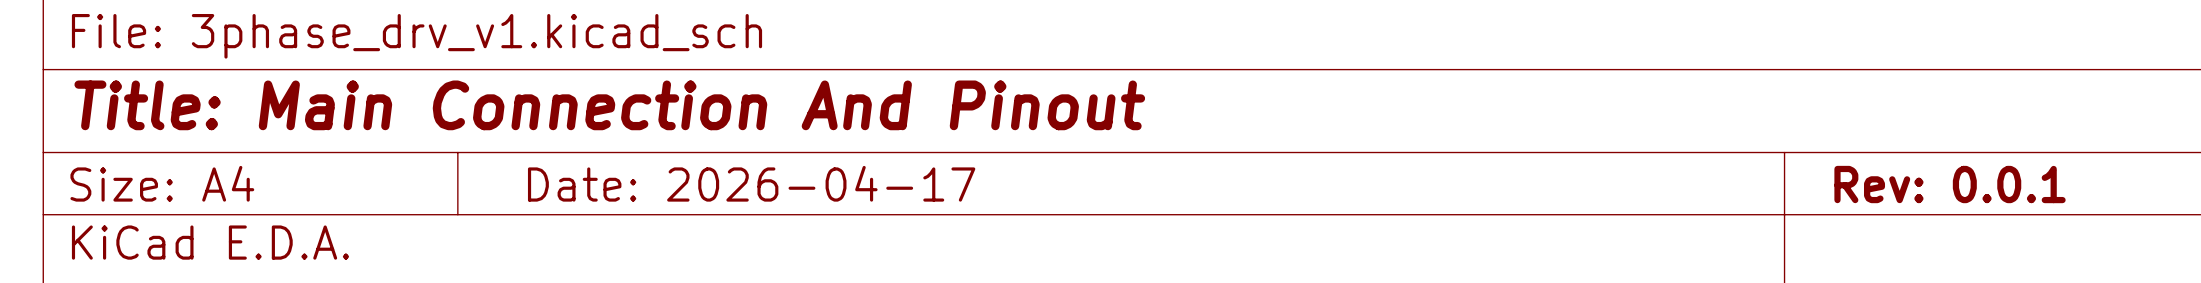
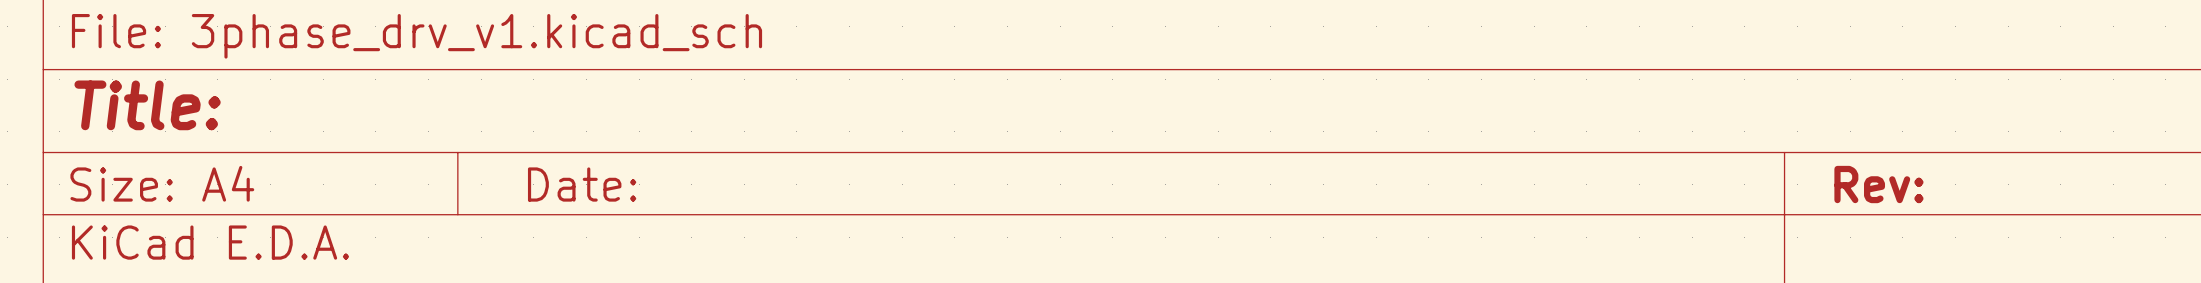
title block: Title: Main Connection And Pinout (609, 105) -> Title: (147, 105)
title block: Date: 2026-04-17 (751, 183) -> Date: (582, 184)
title block: Rev: 0.0.1 (1950, 184) -> Rev: (1878, 184)

